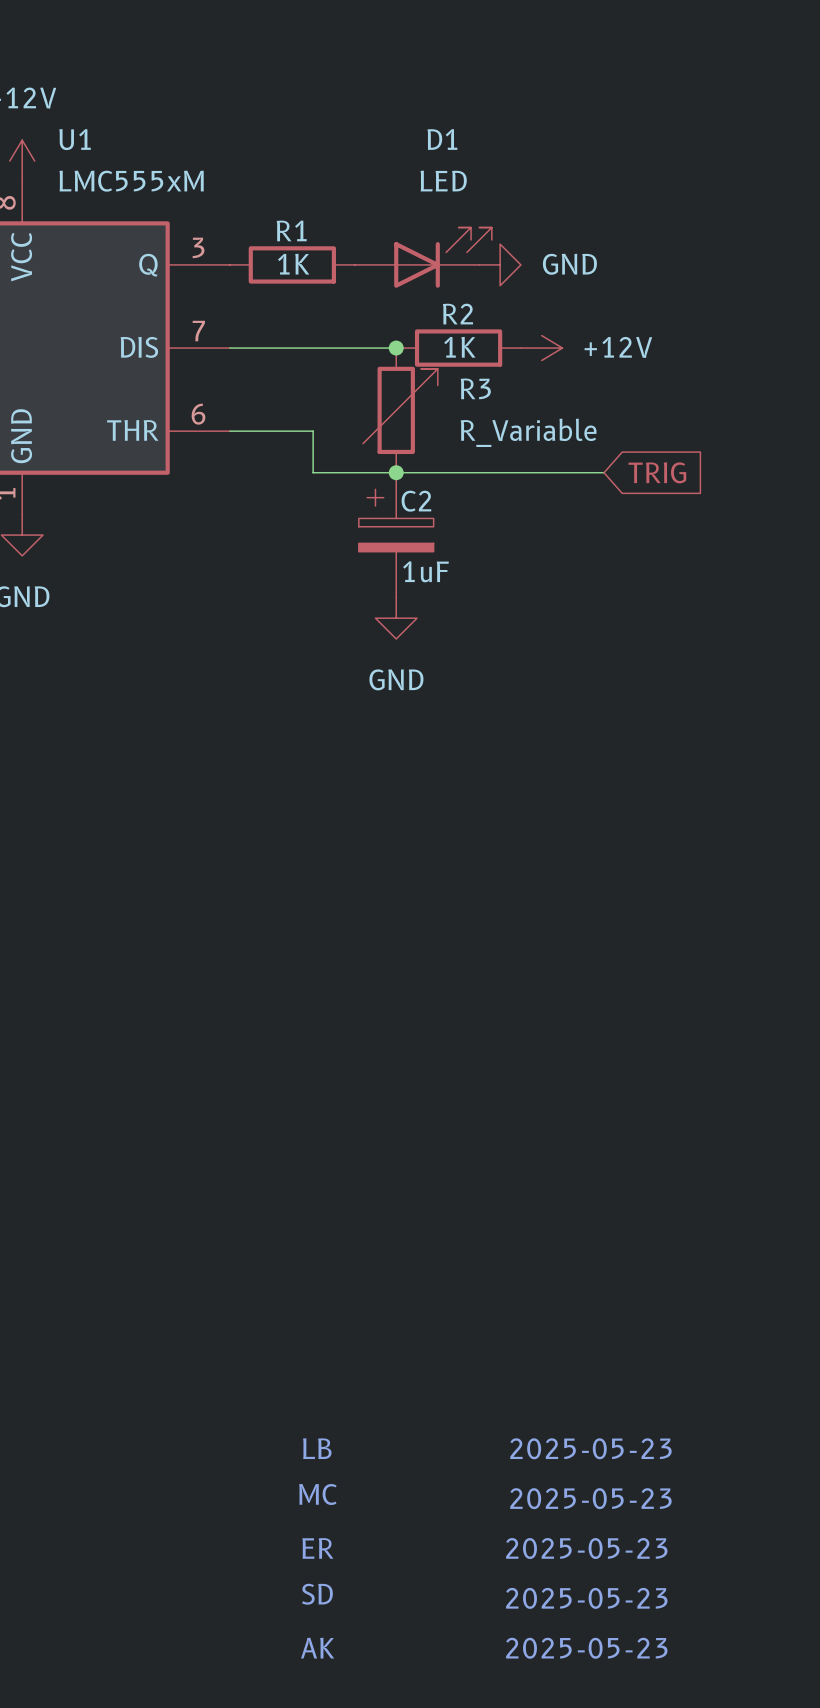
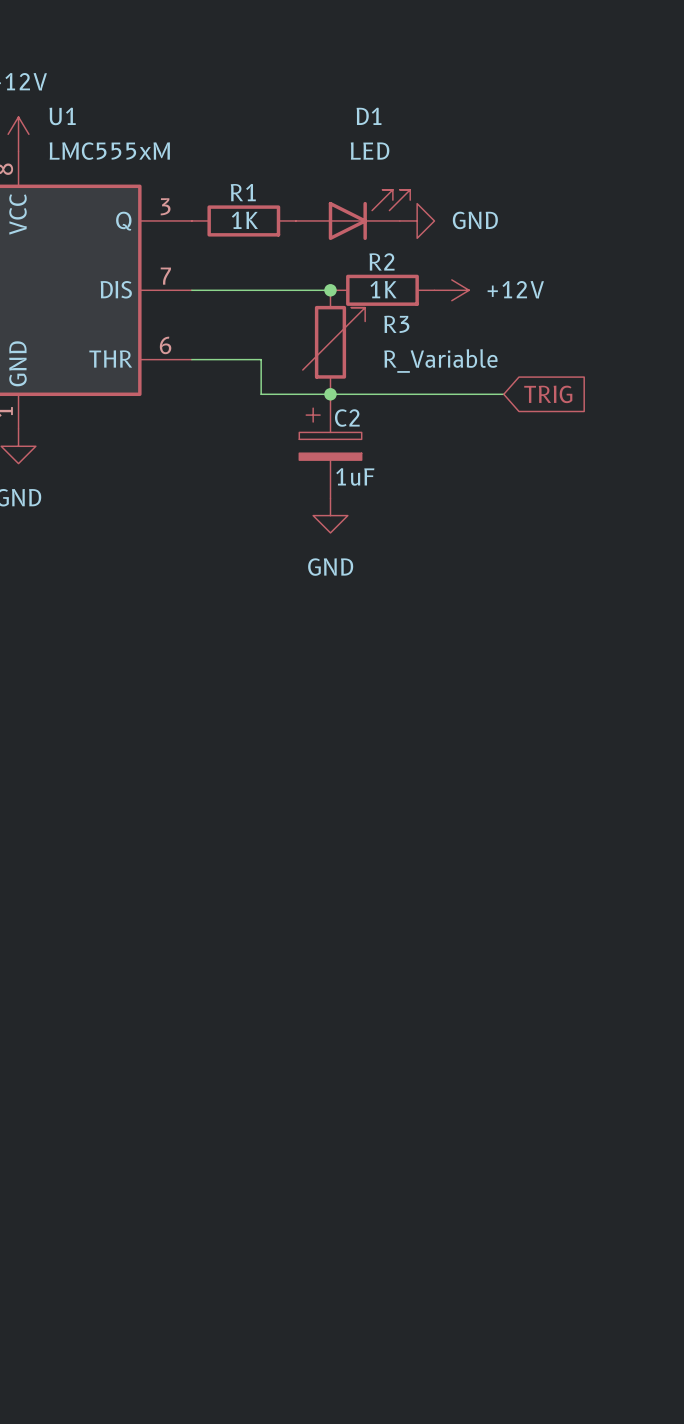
text: LB (317, 1448) -> none
text: 2025-05-23 (590, 1448) -> none
text: MC (317, 1494) -> none
text: 2025-05-23 (590, 1498) -> none
text: ER (317, 1548) -> none
text: 2025-05-23 (586, 1548) -> none
text: SD (317, 1594) -> none
text: 2025-05-23 (586, 1598) -> none
text: AK (317, 1648) -> none
text: 2025-05-23 (586, 1648) -> none

